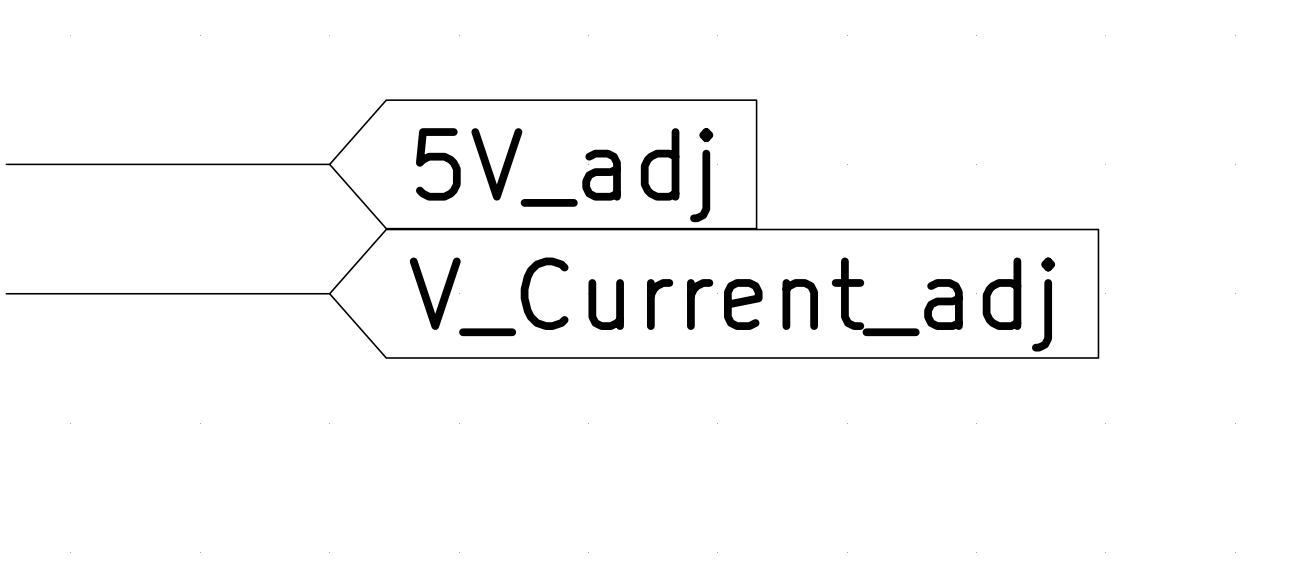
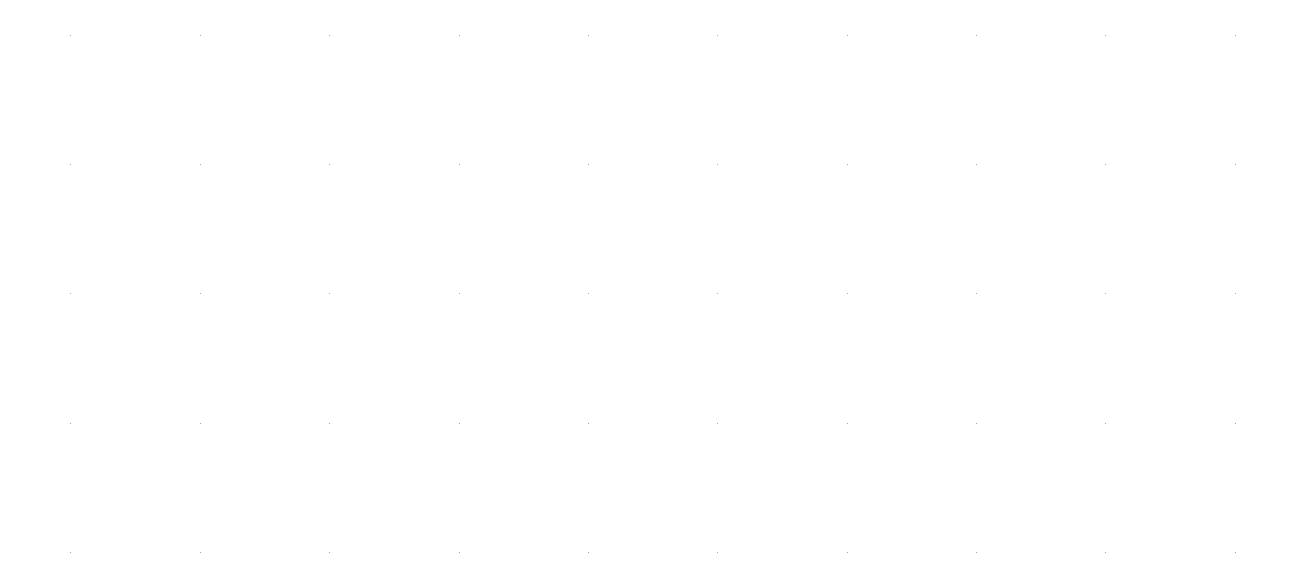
wire: (6, 164) (329, 164) -> none
global label: 5V_adj (564, 175) -> none
wire: (6, 293) (329, 293) -> none
global label: V_Current_adj (732, 304) -> none

